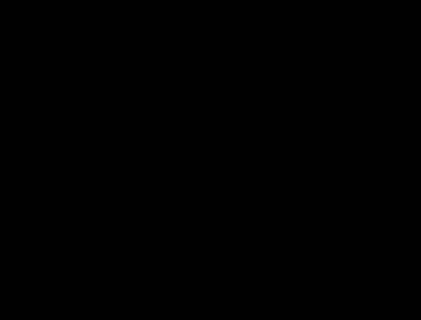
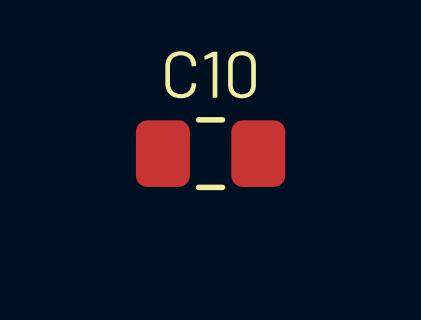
C10: none -> (210, 153)

